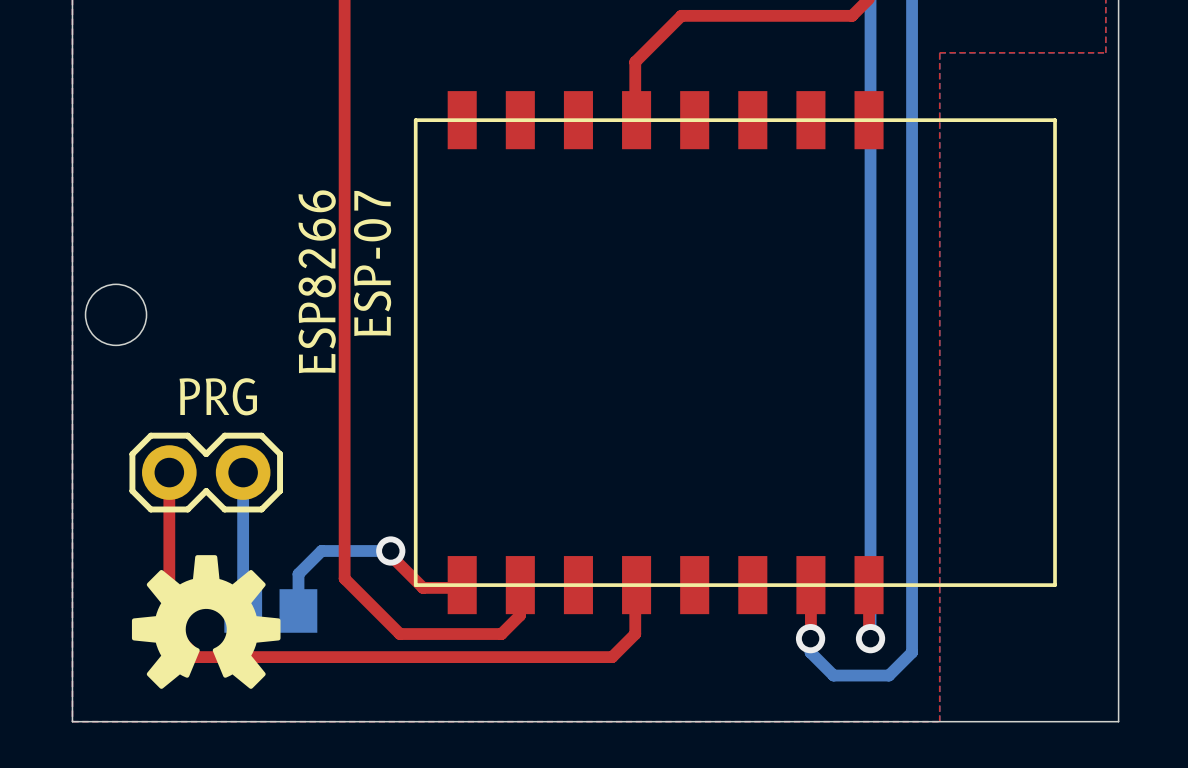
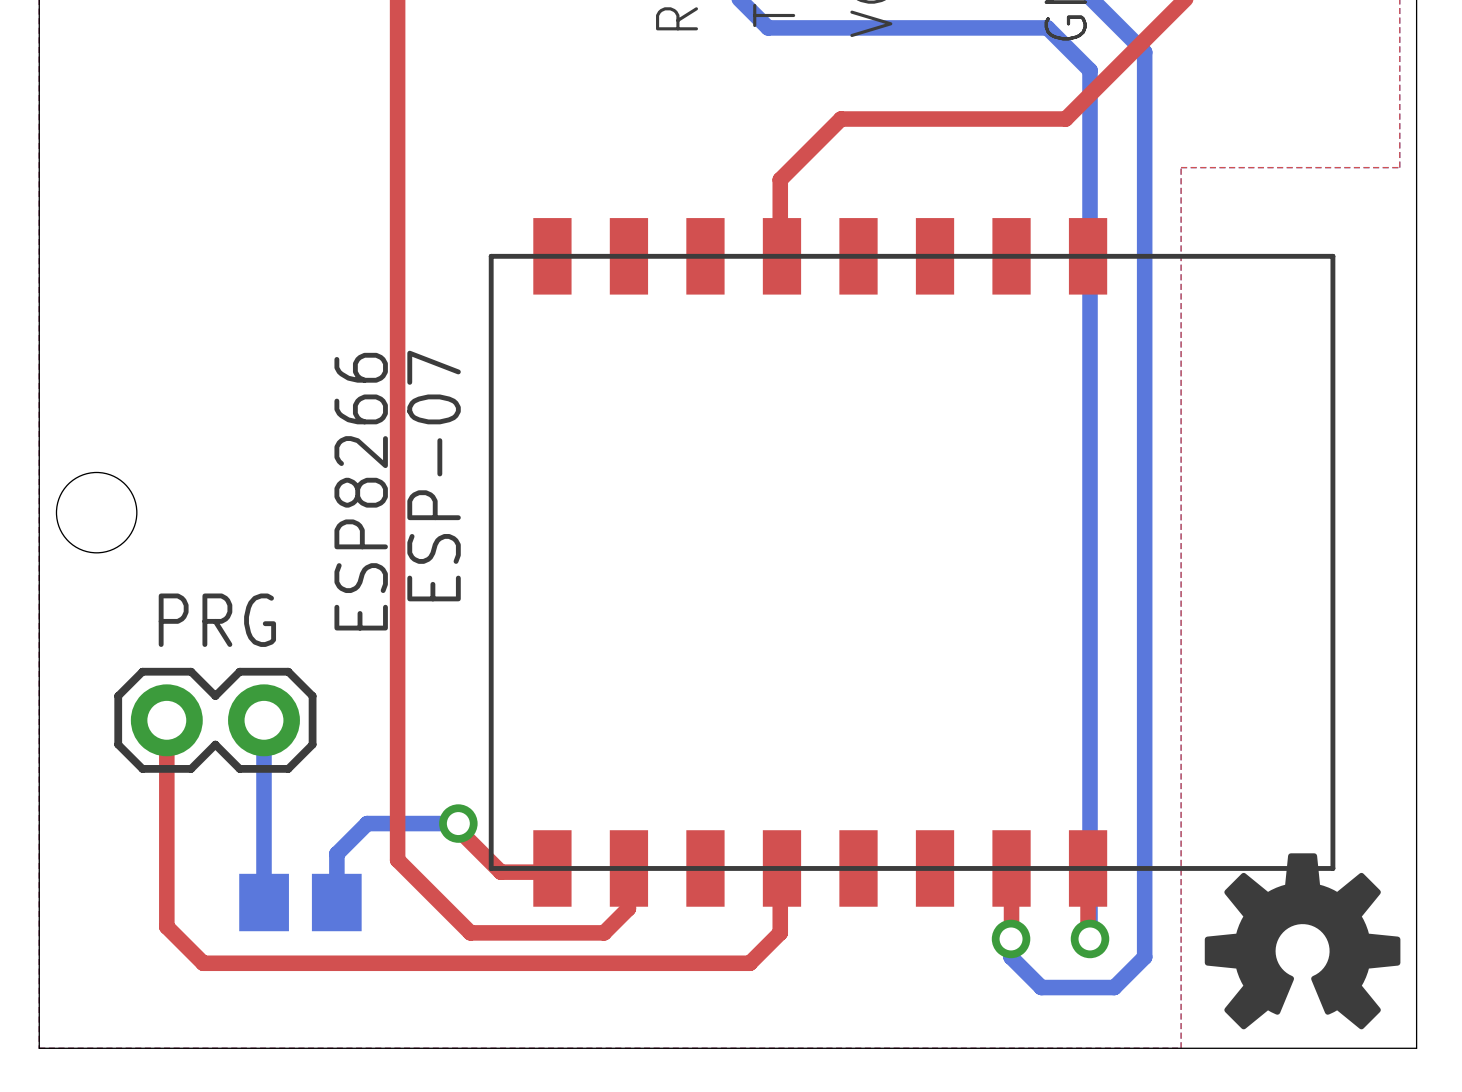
drawing: [131, 555, 281, 689] -> none
drawing: none -> [1204, 853, 1401, 1030]

